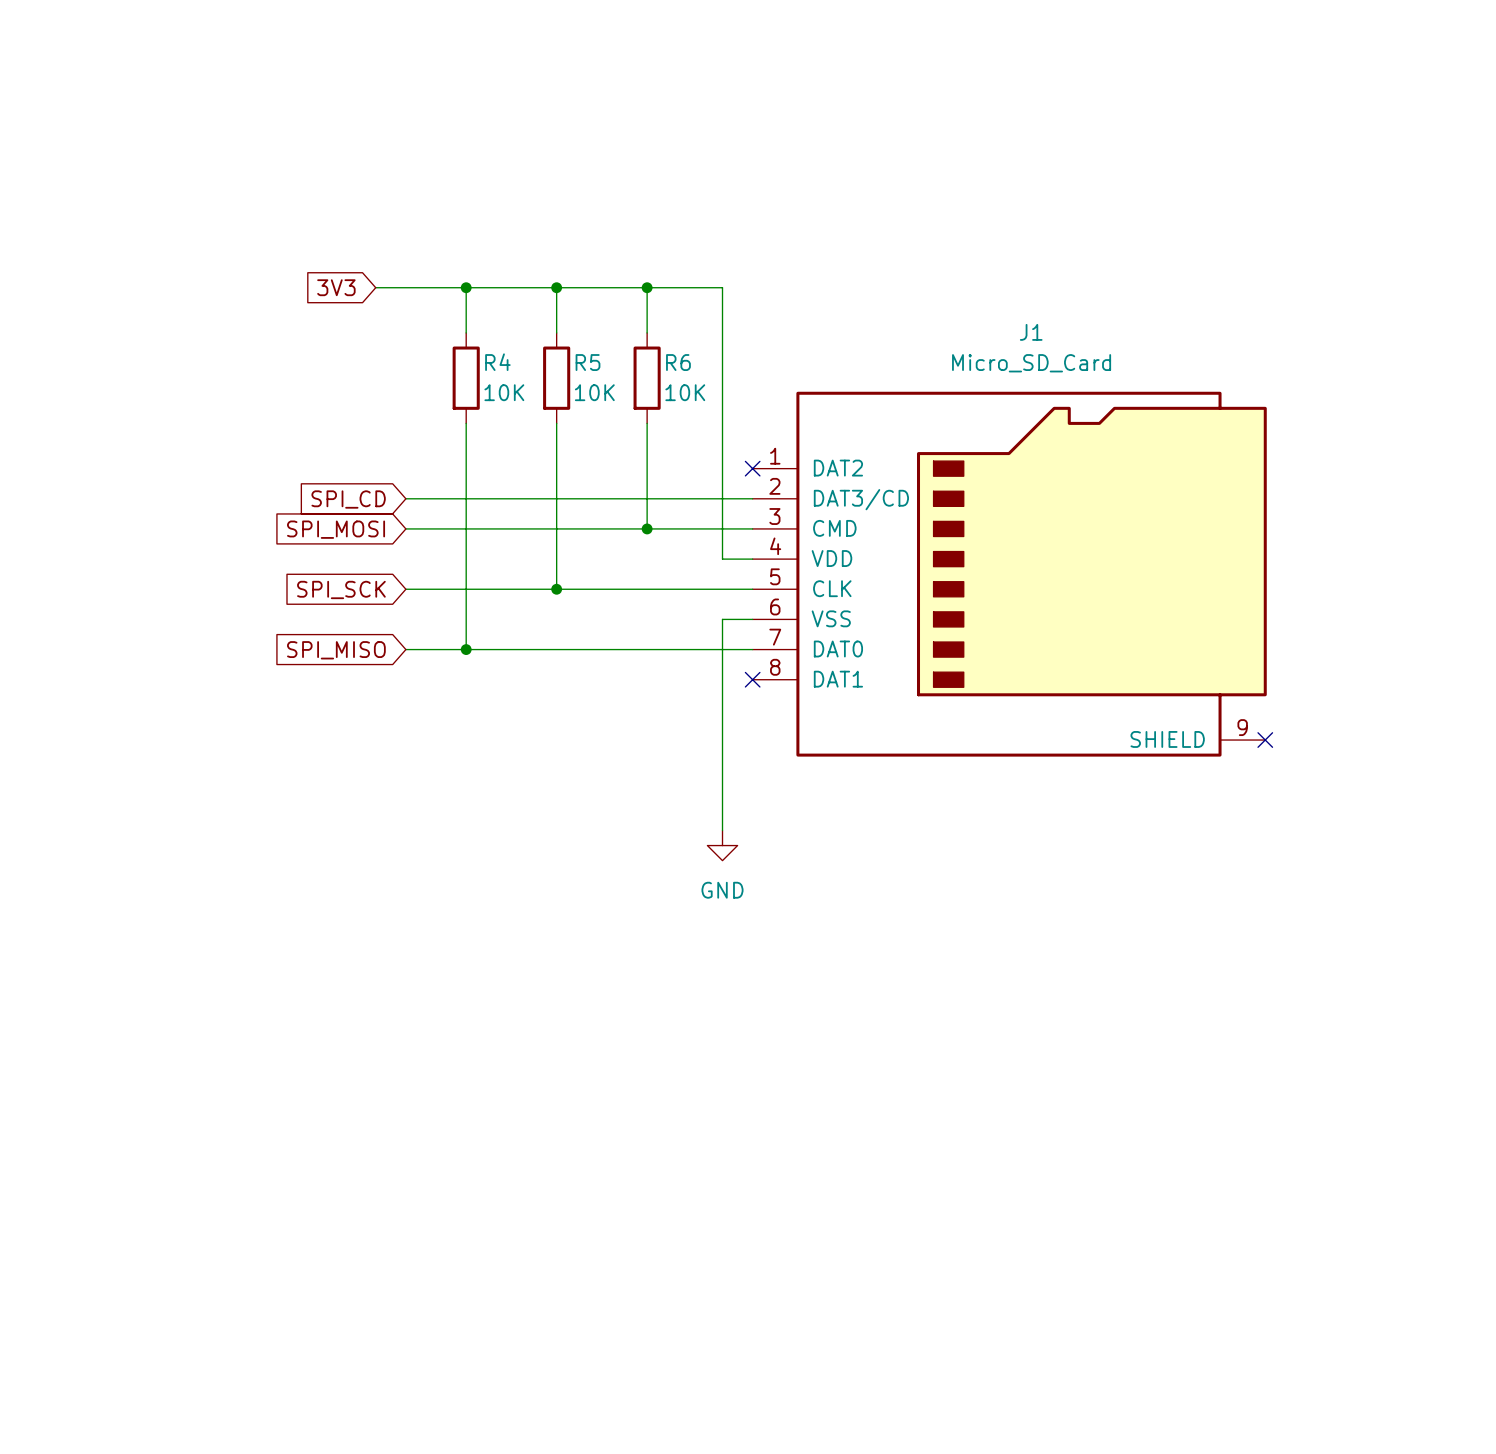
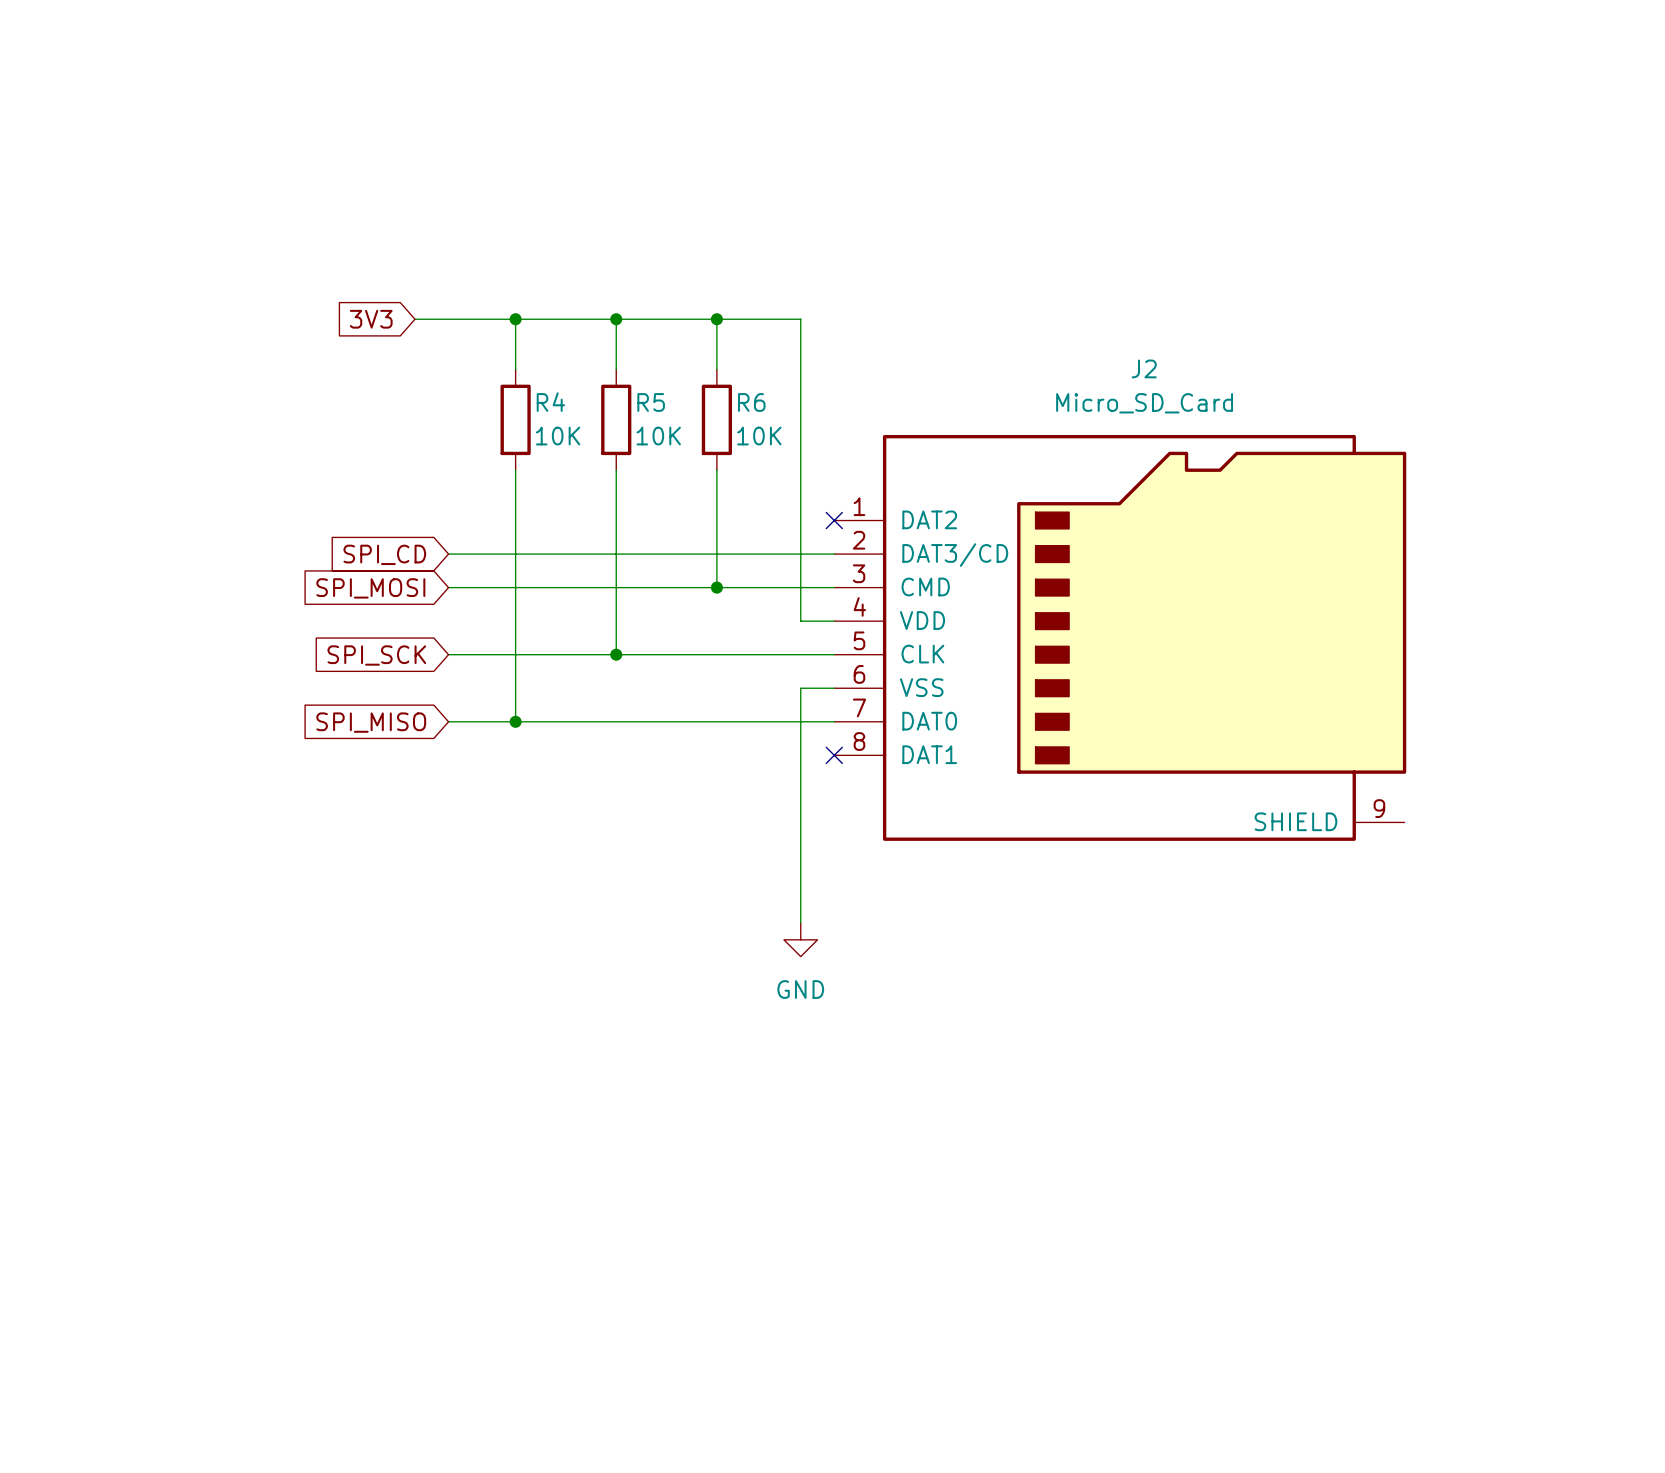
J1 name: J1 (1031, 332) -> J2 (1144, 368)
no-connect mark: (1265, 740) -> none

